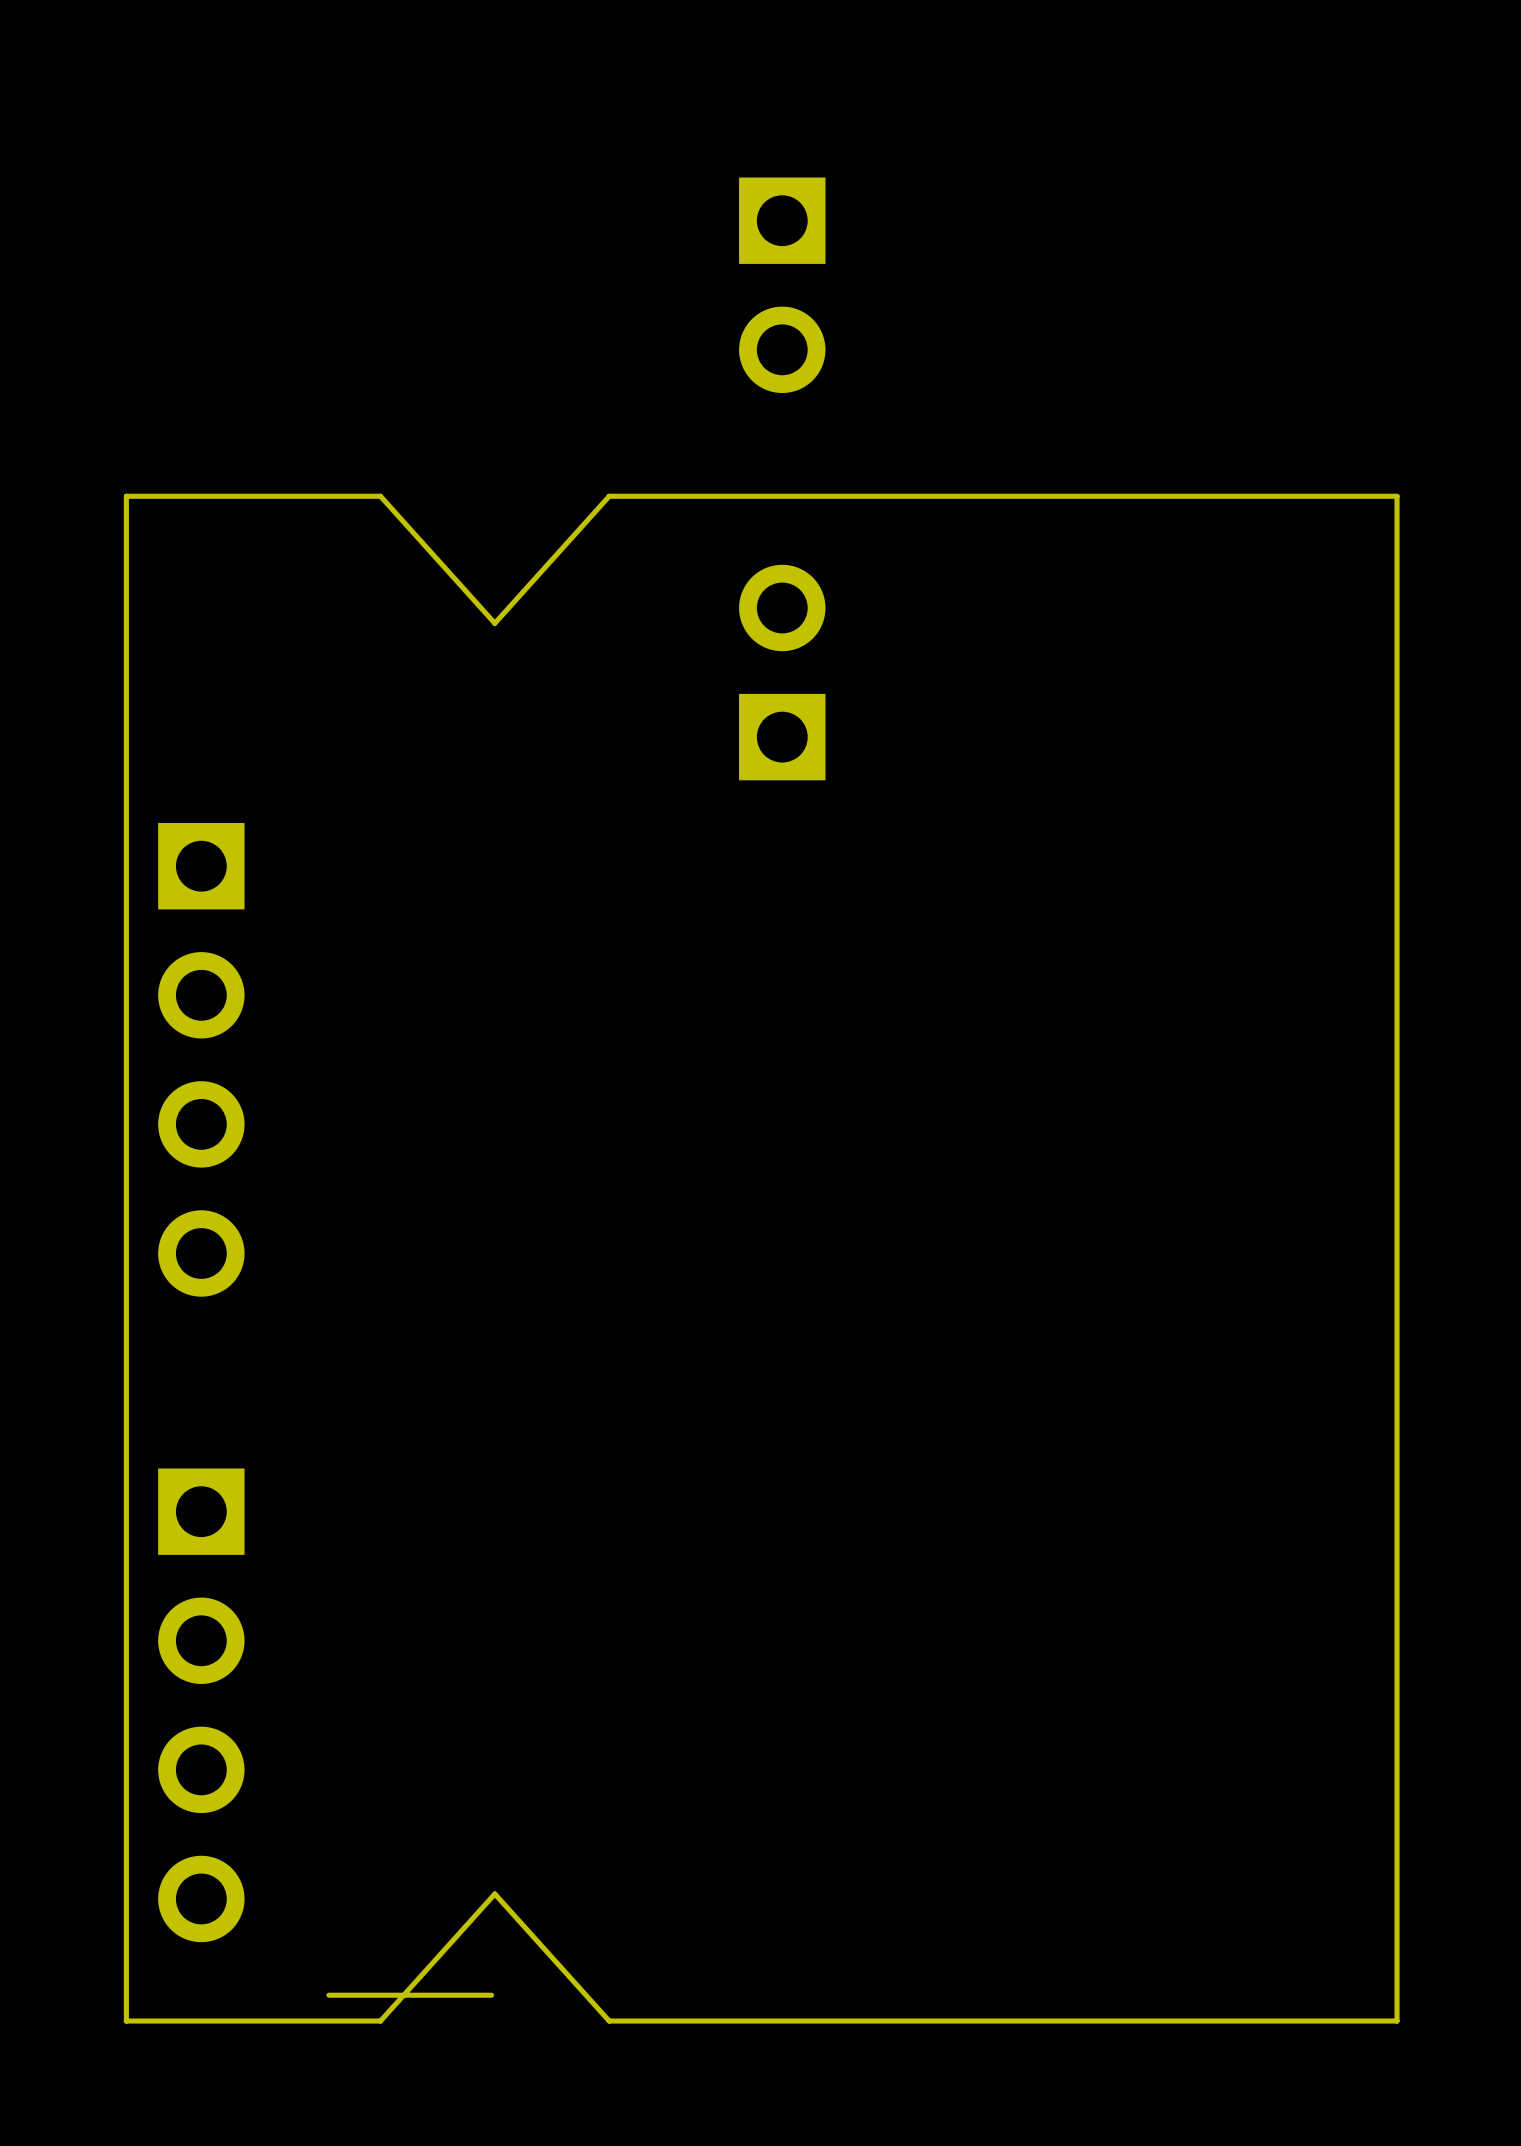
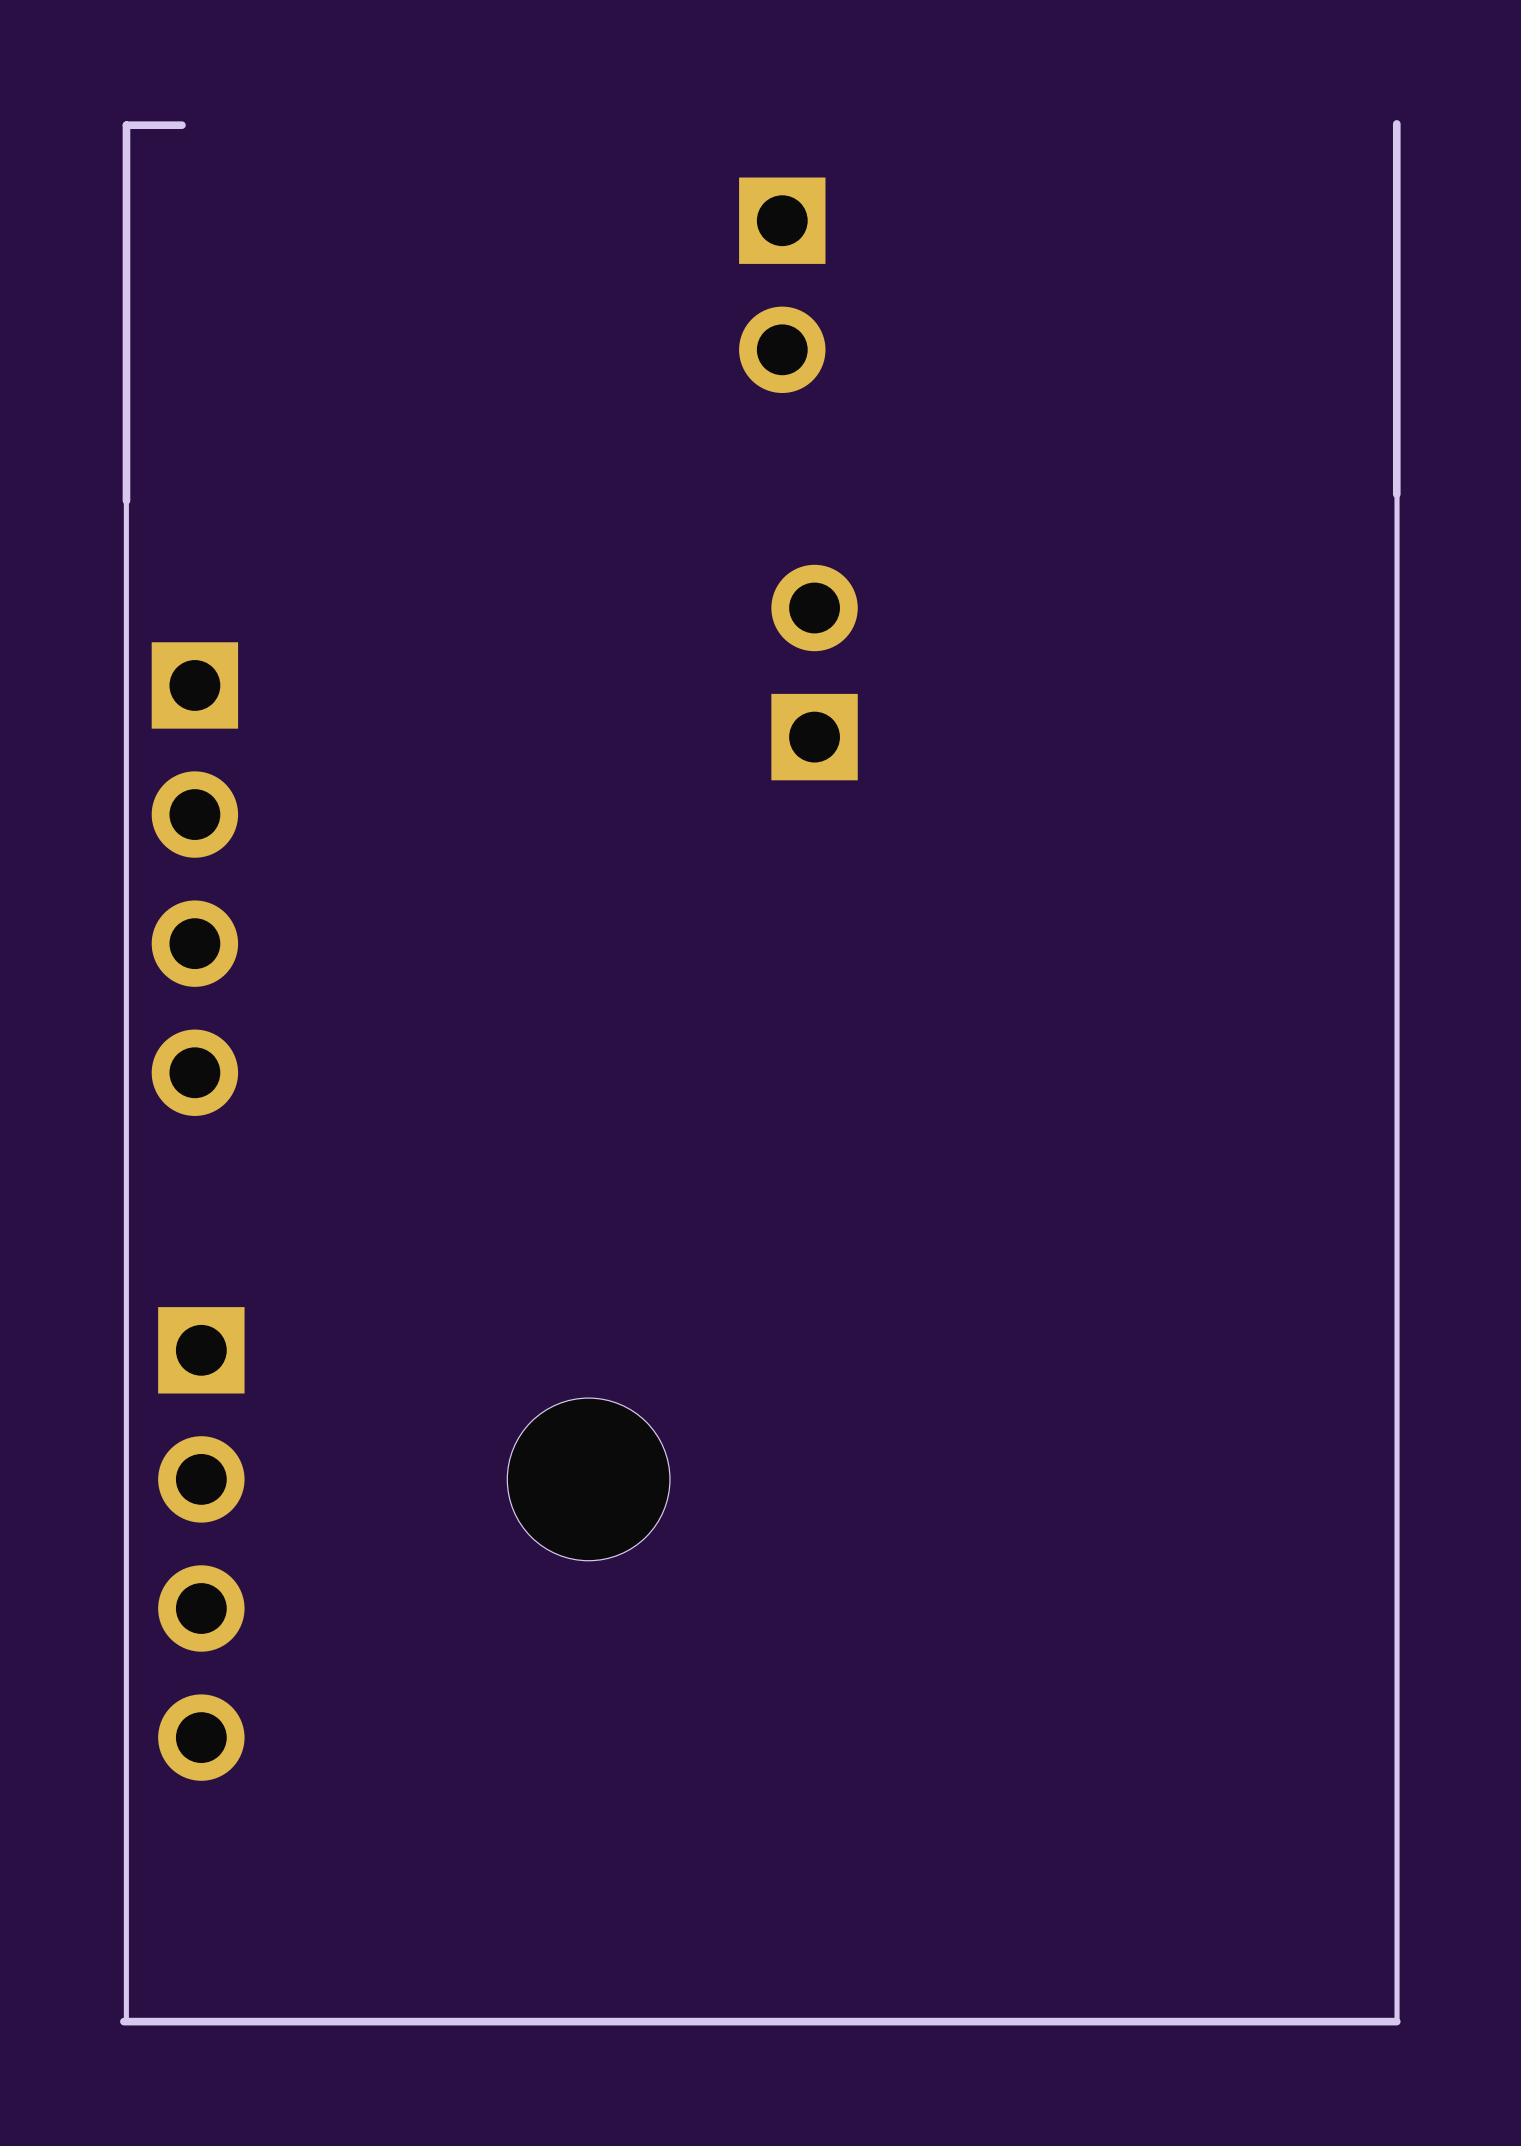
board edge: none -> (181, 125) (126, 125) (126, 500)
board edge: (1397, 496) (609, 496) (494, 623) (380, 496) (126, 496) -> (1396, 494) (1396, 123)
part position: (782, 672) -> (814, 672)
part position: (201, 1059) -> (194, 879)
part: none -> (588, 1479)
part position: (201, 1705) -> (201, 1543)
board edge: (491, 1995) (328, 1995) -> none
board edge: (1397, 2021) (609, 2021) (494, 1893) (380, 2021) (126, 2021) -> (1396, 2021) (123, 2021)

